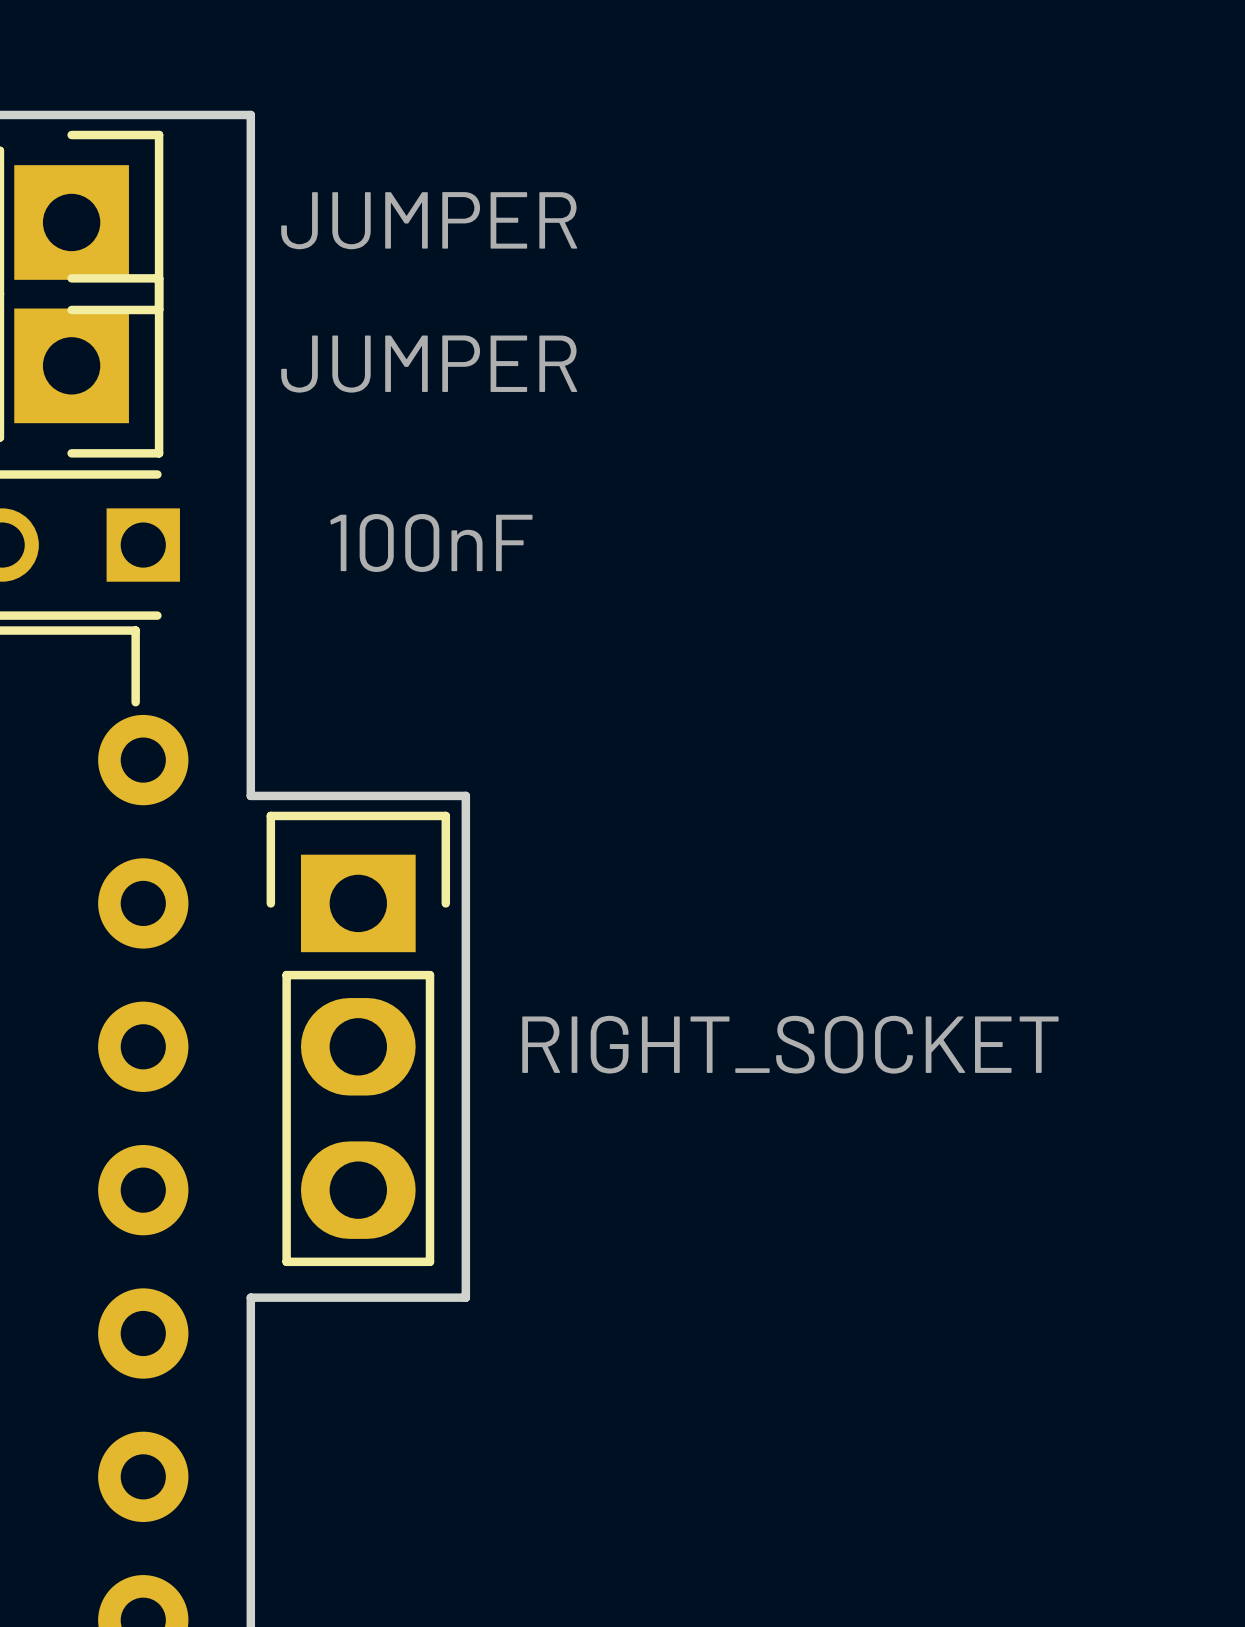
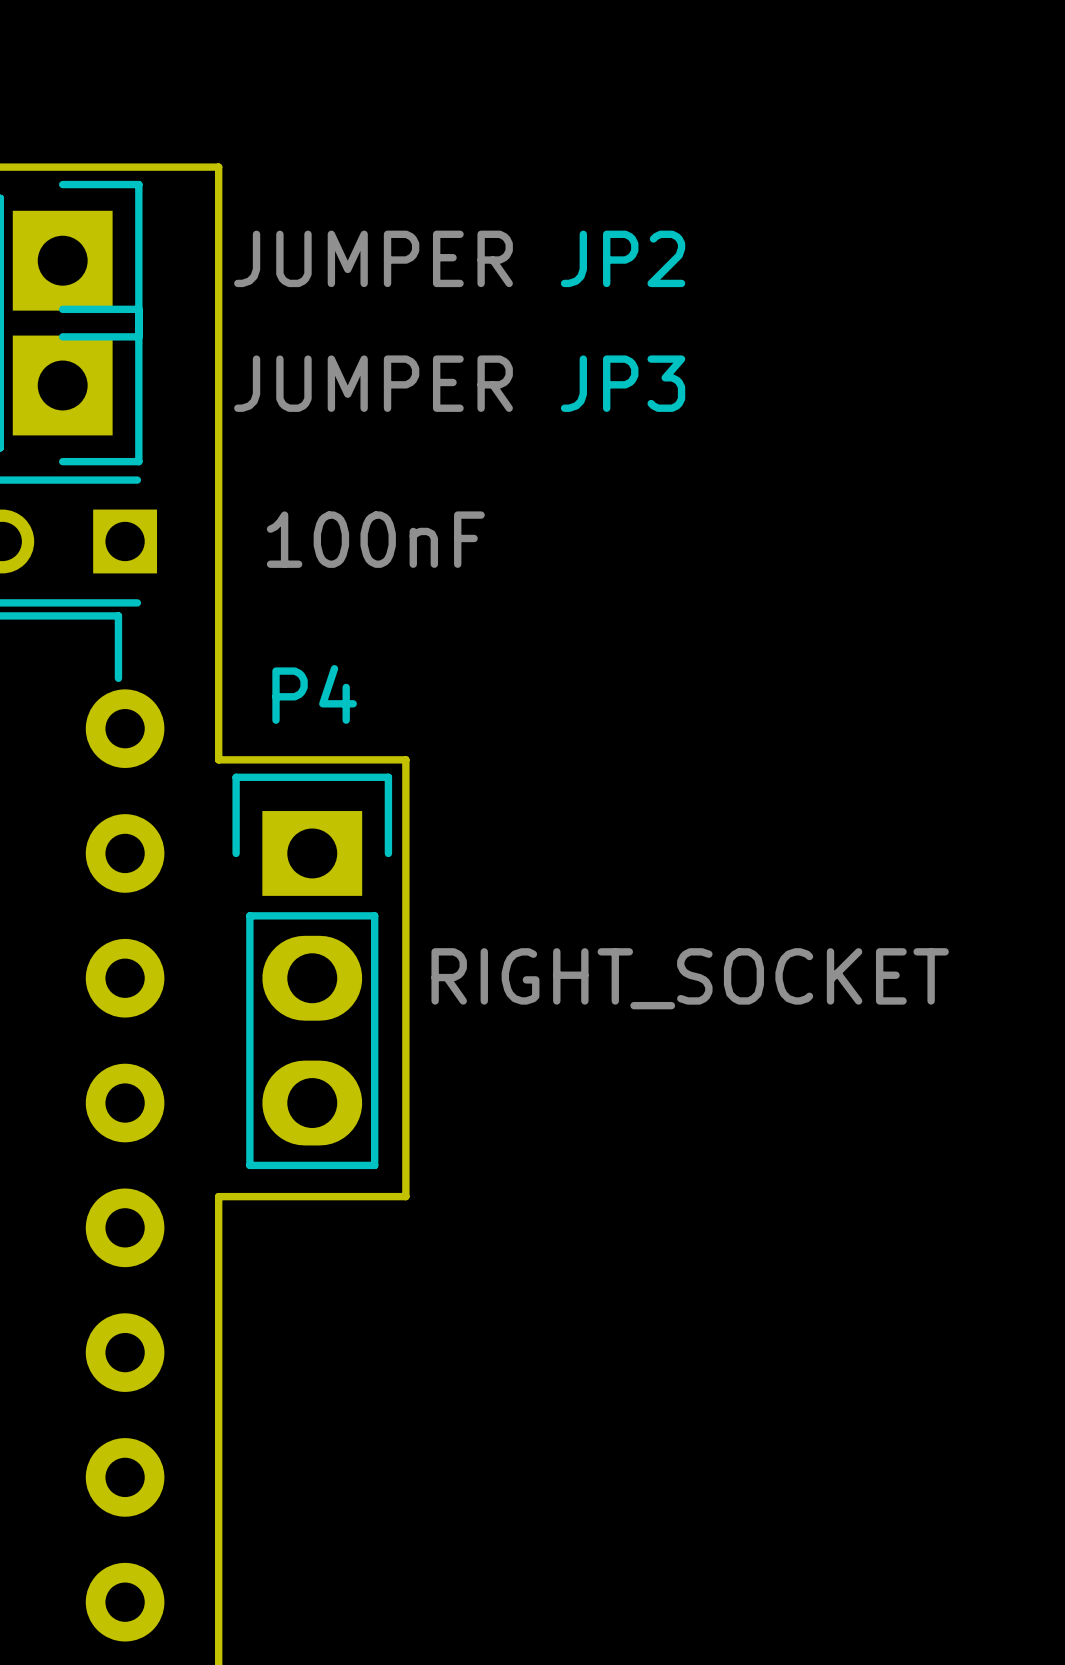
JP2 name: none -> JP2 (623, 258)
JP3 name: none -> JP3 (623, 383)
P4 name: none -> P4 (314, 694)

